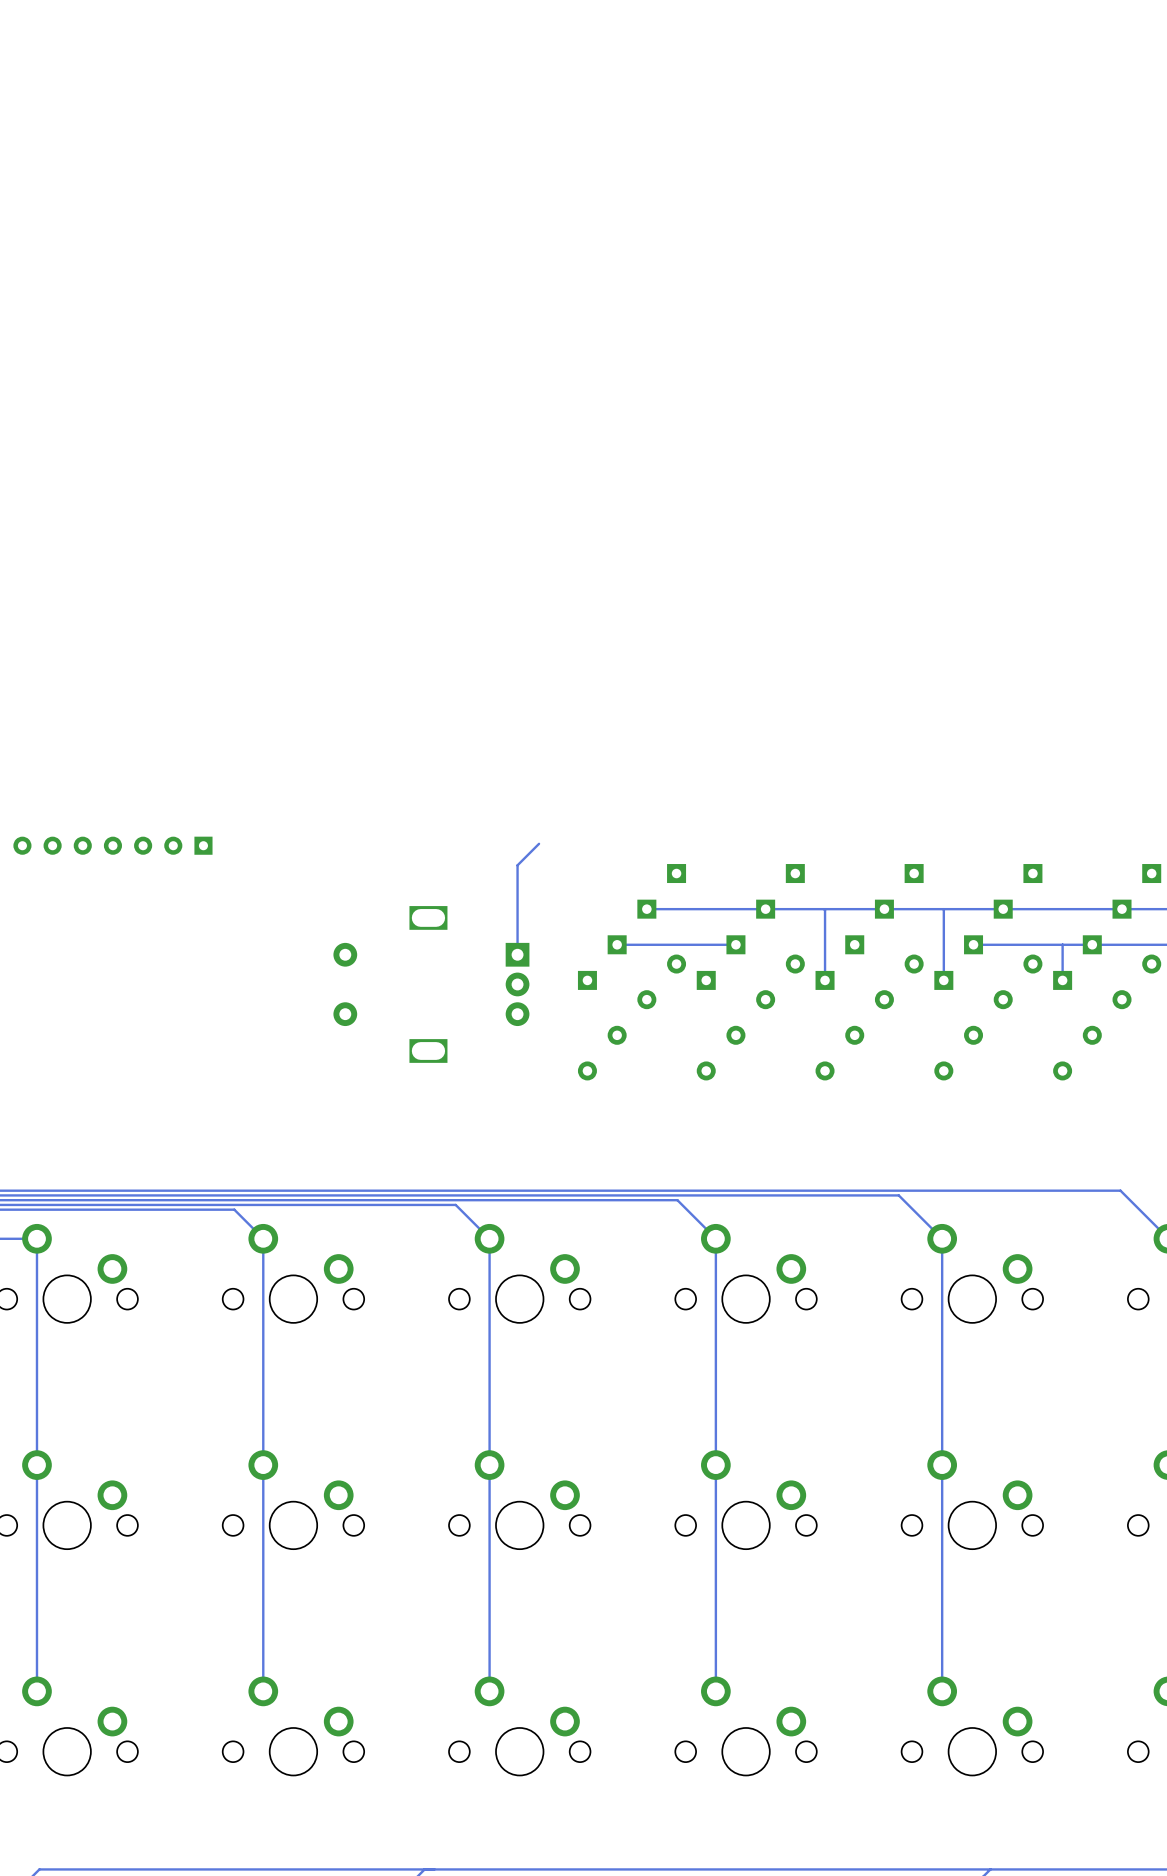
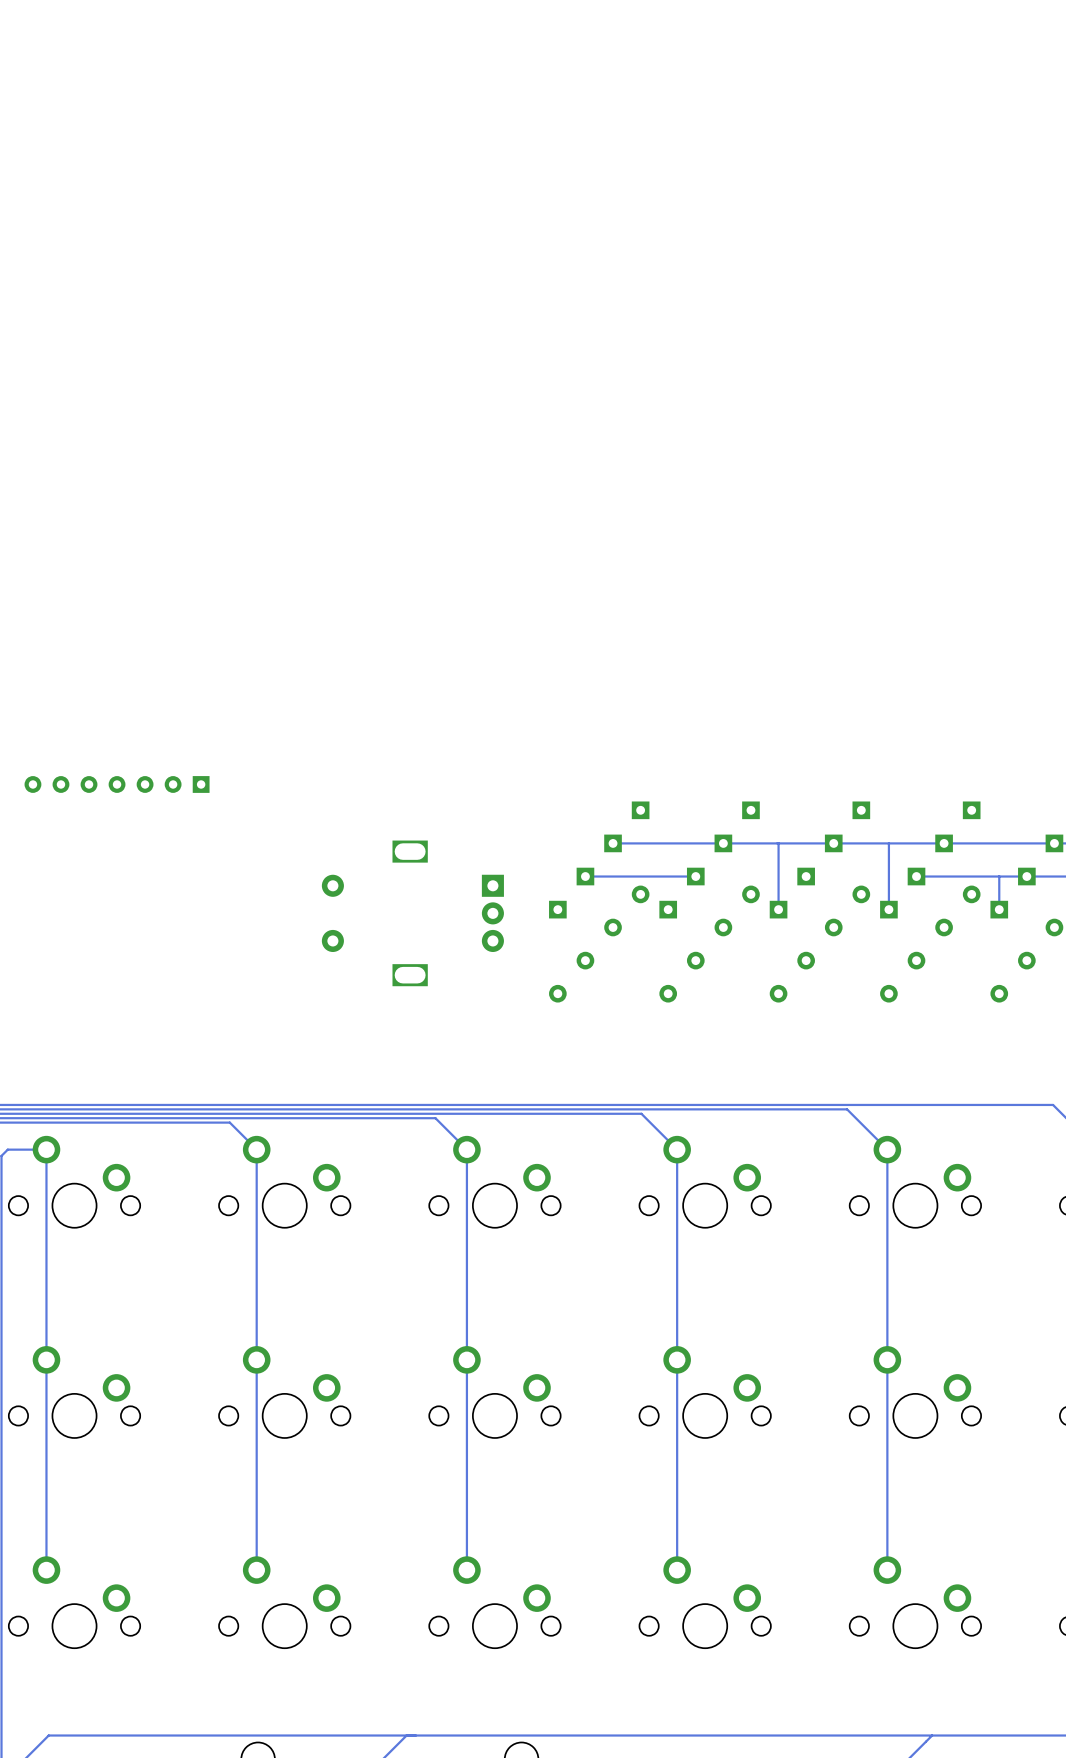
track: (539, 843) (517, 865) (517, 954) -> none

